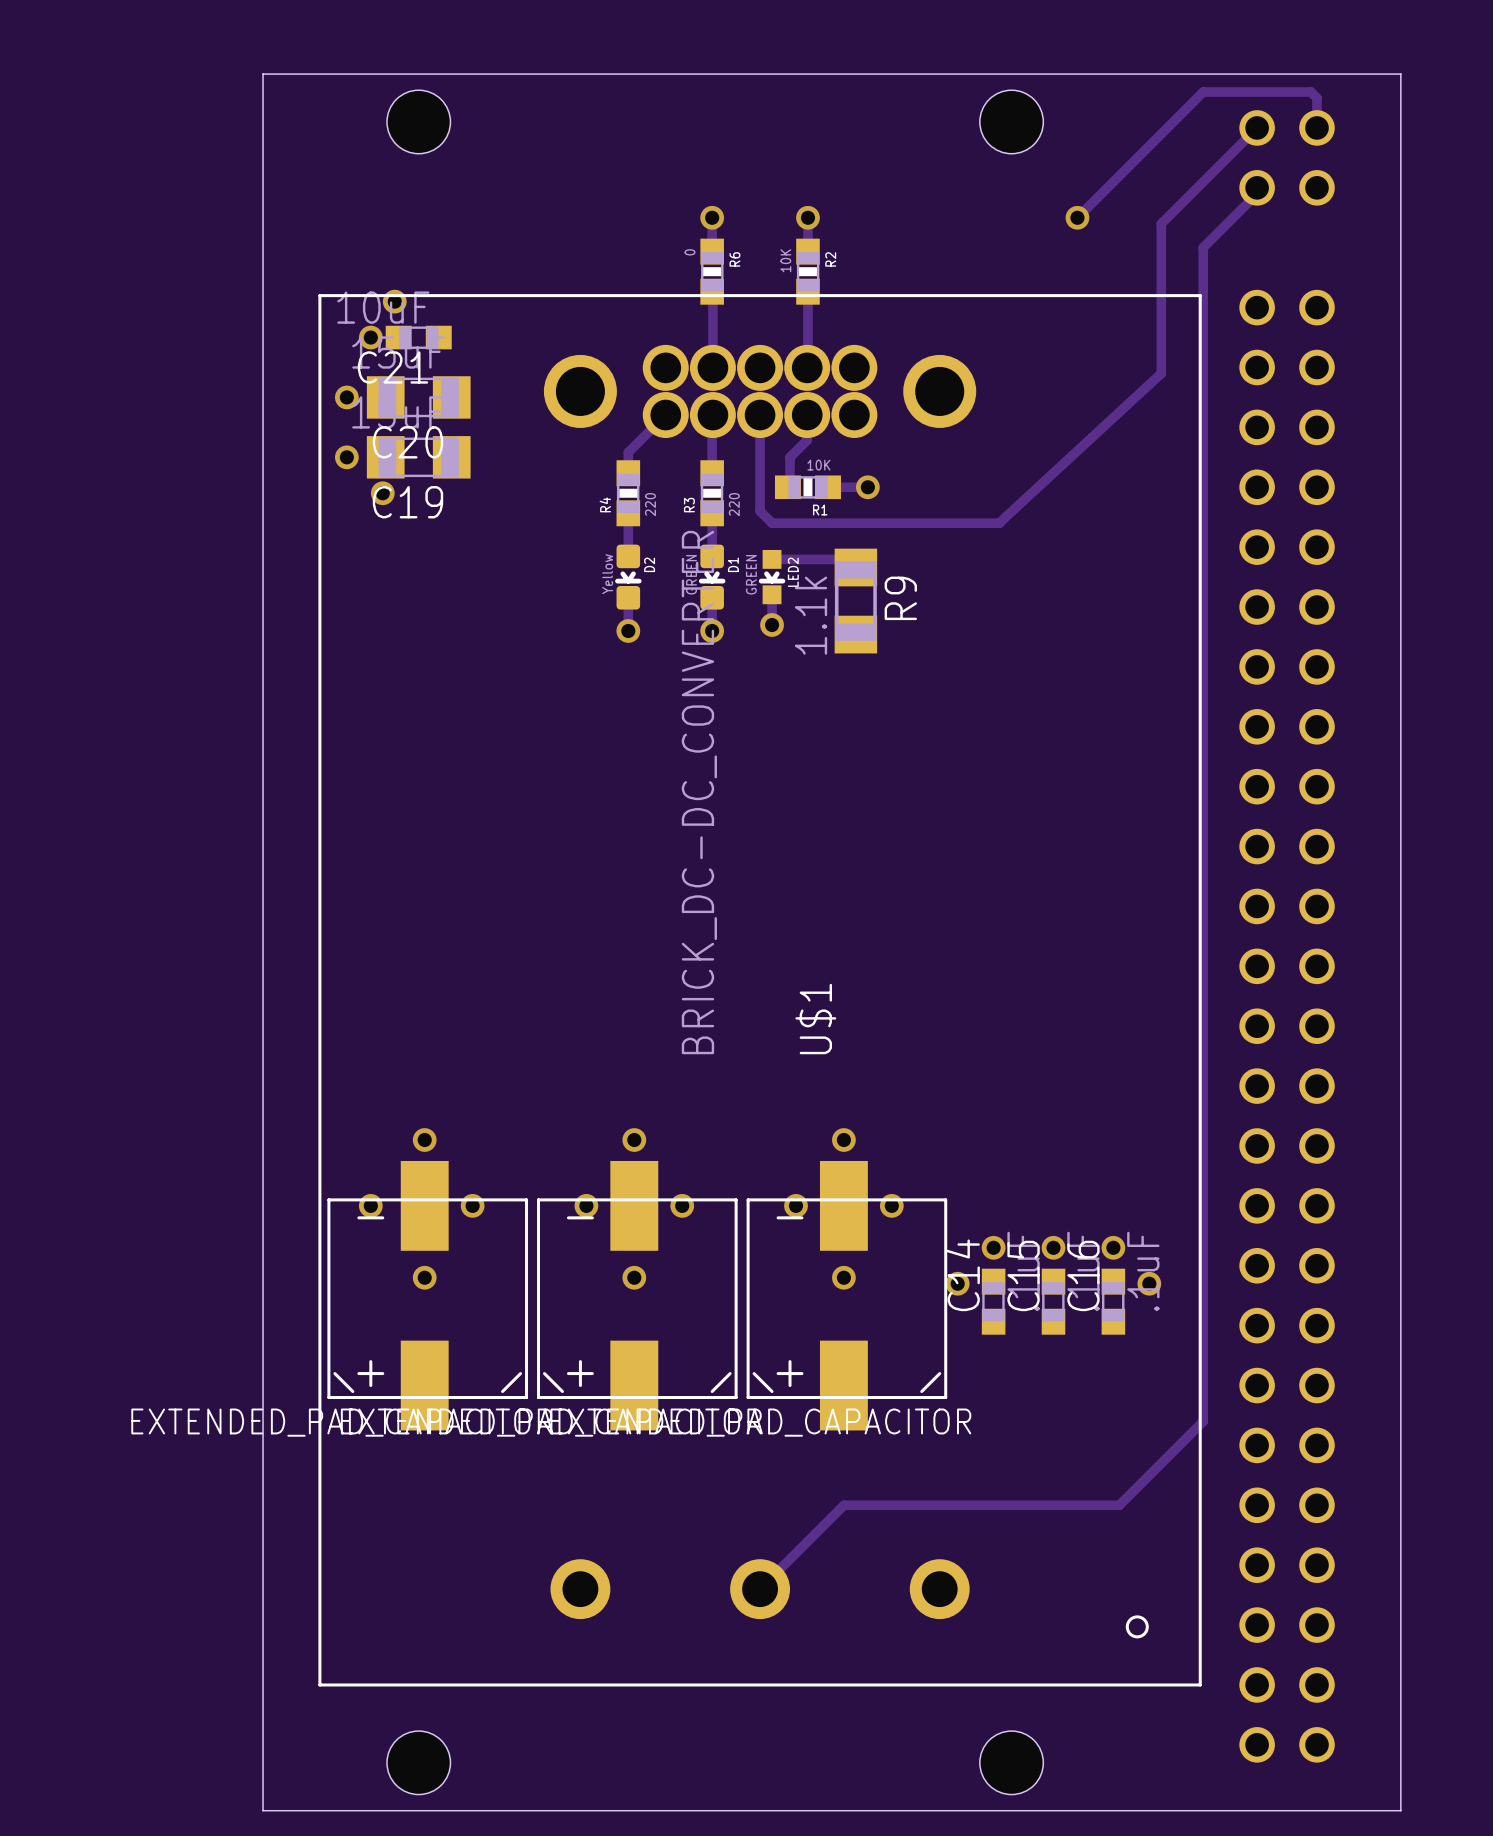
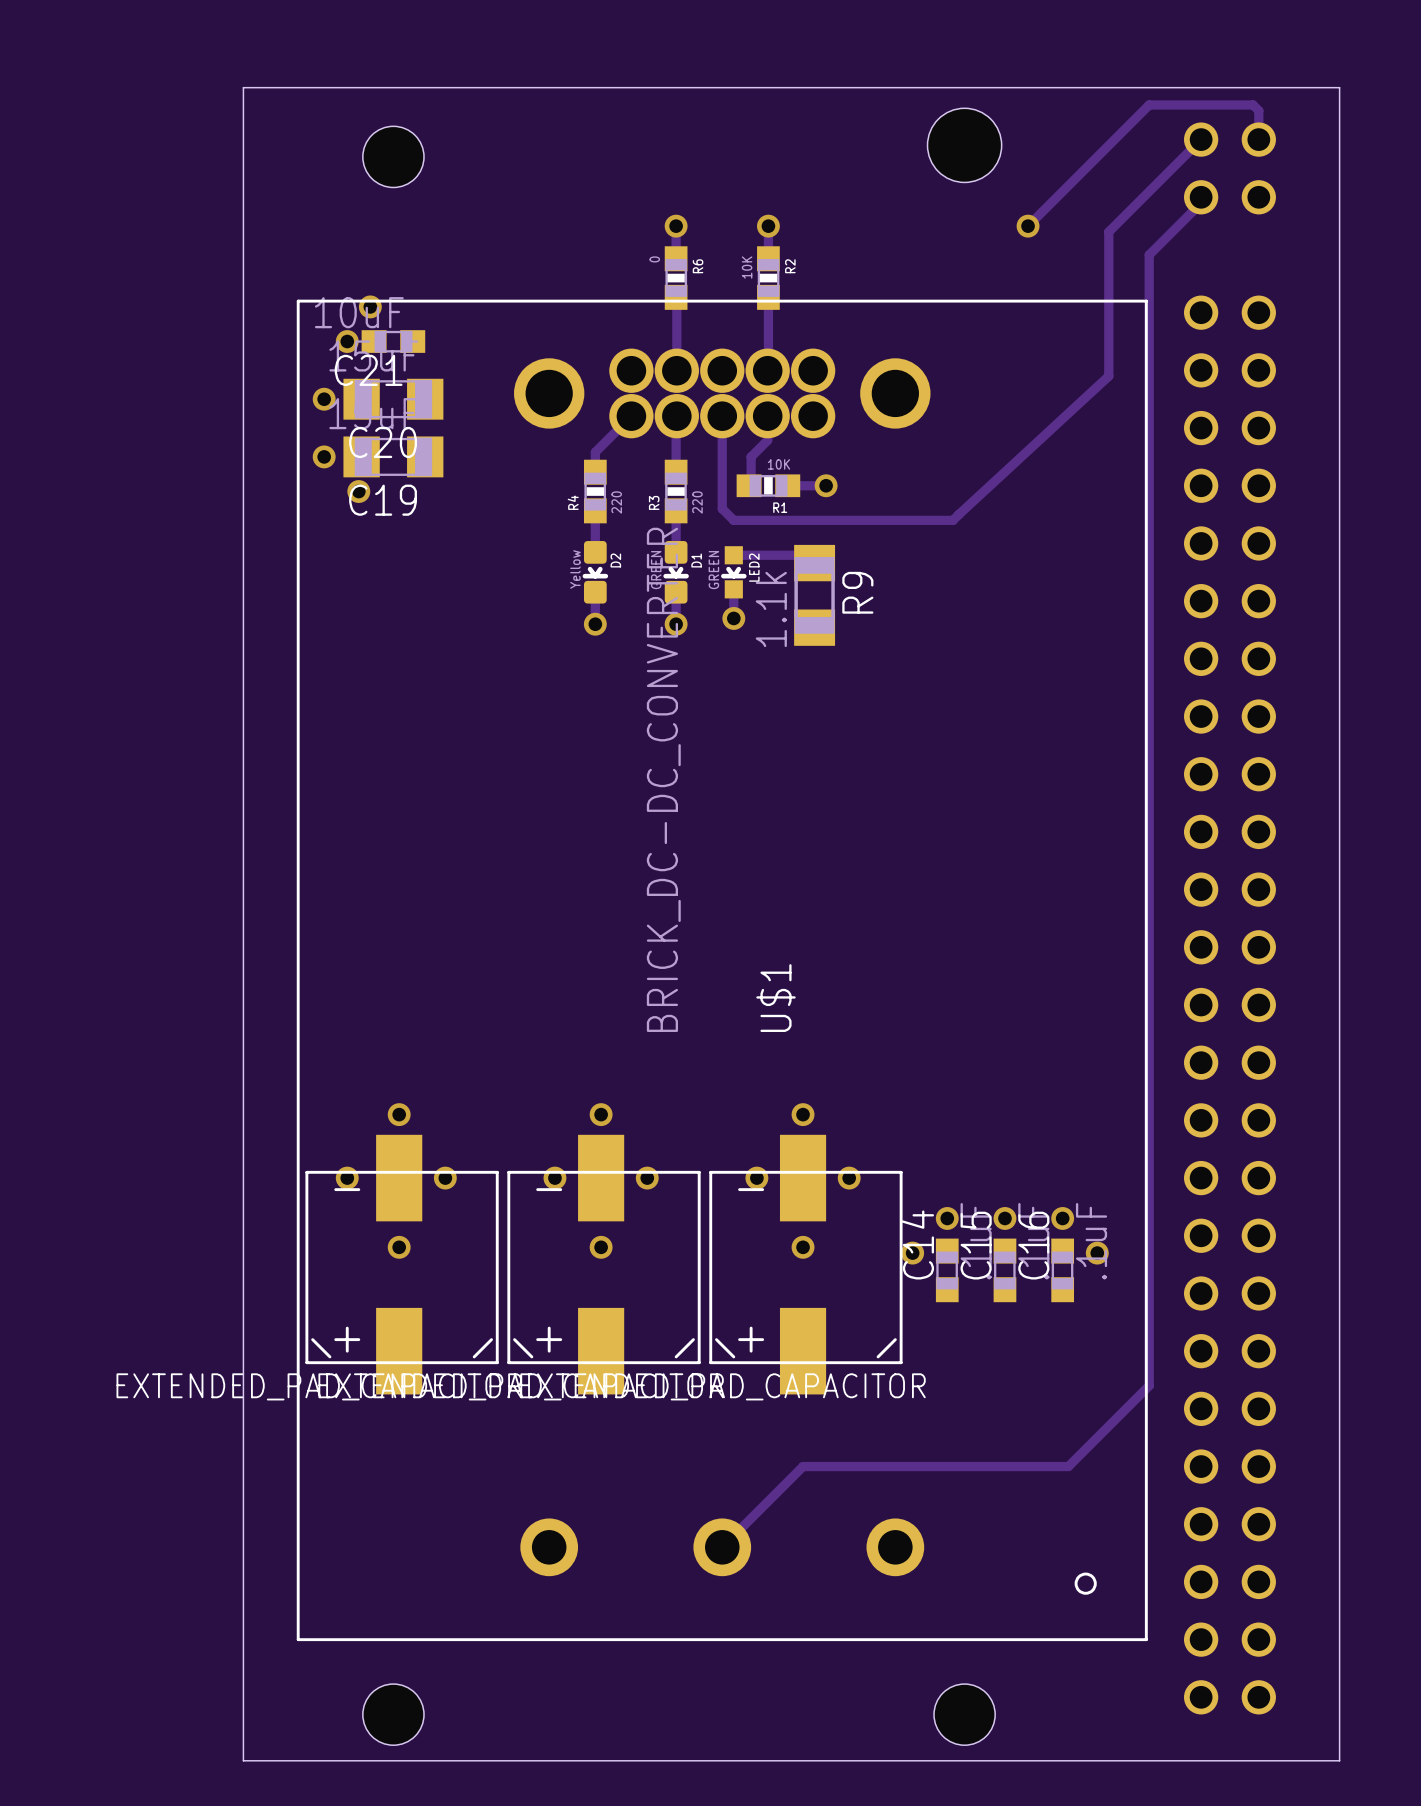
hole size: [979, 90, 1044, 154] -> [927, 108, 1002, 183]
hole position: (418, 121) -> (393, 156)

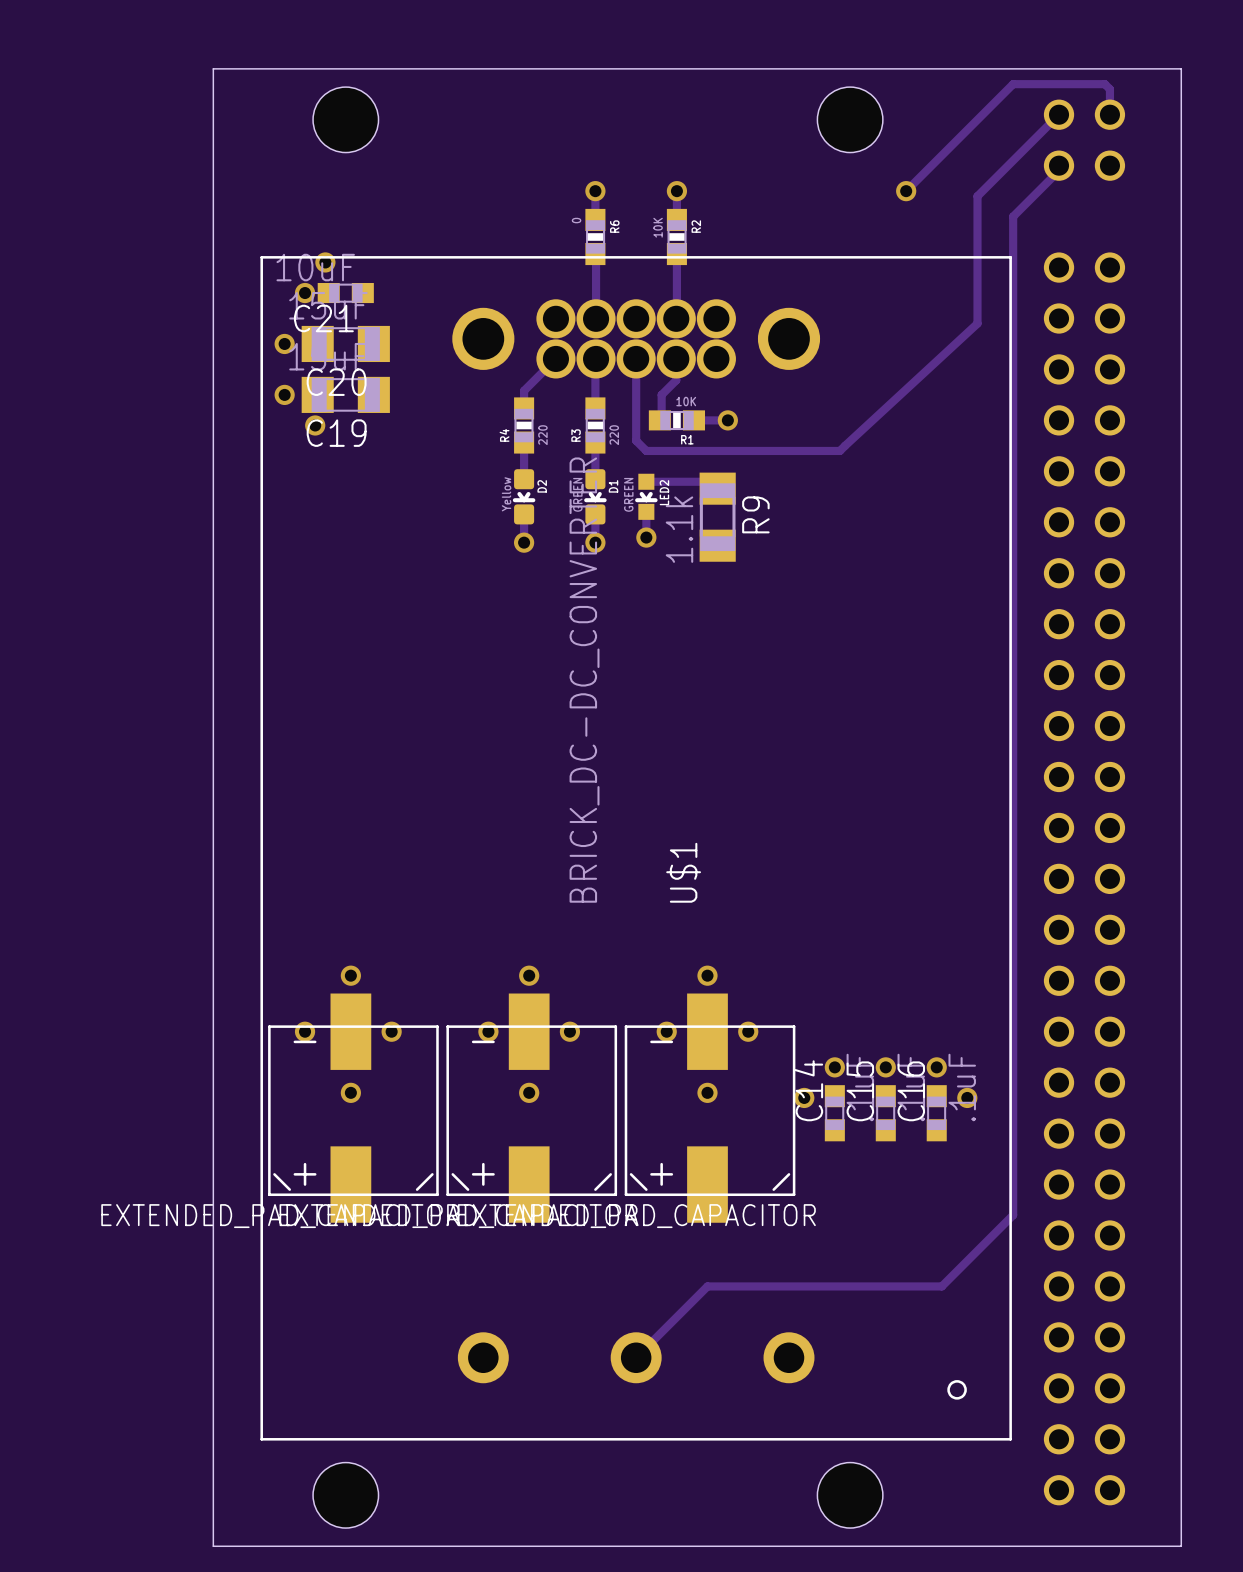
hole size: [362, 126, 424, 188] -> [313, 87, 379, 153]
hole size: [362, 1684, 424, 1746] -> [313, 1462, 379, 1529]
hole size: [934, 1684, 996, 1746] -> [817, 1462, 883, 1529]

